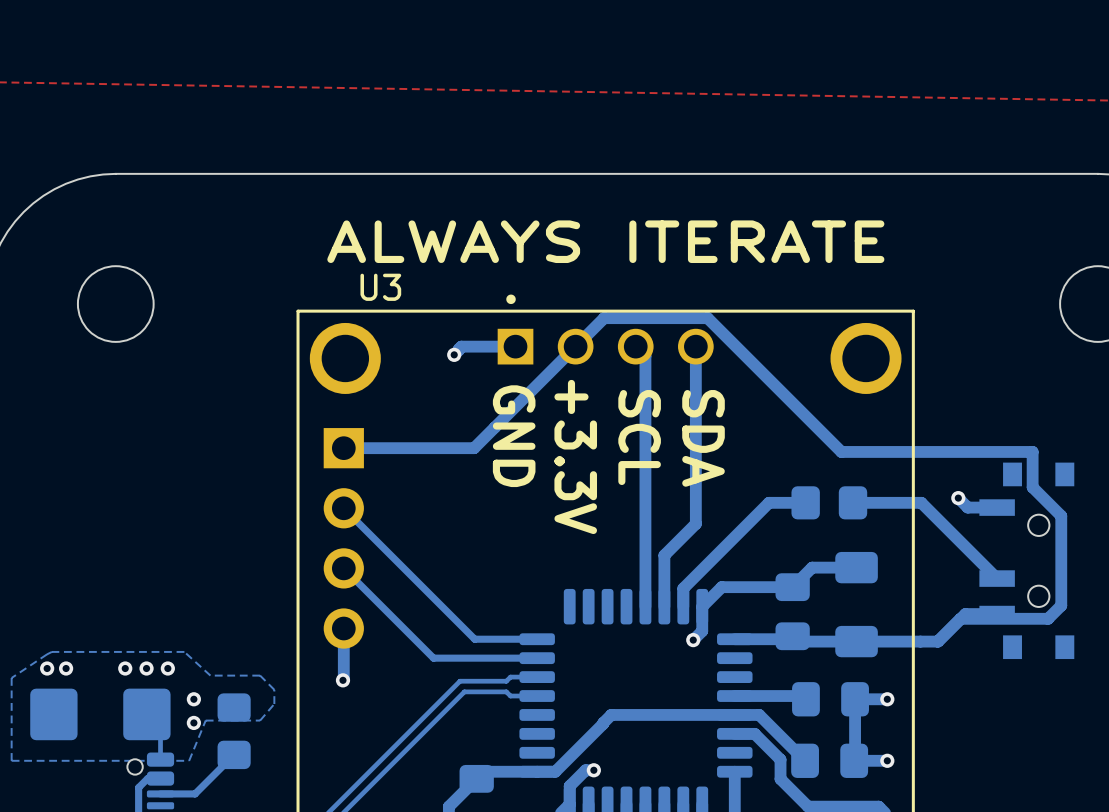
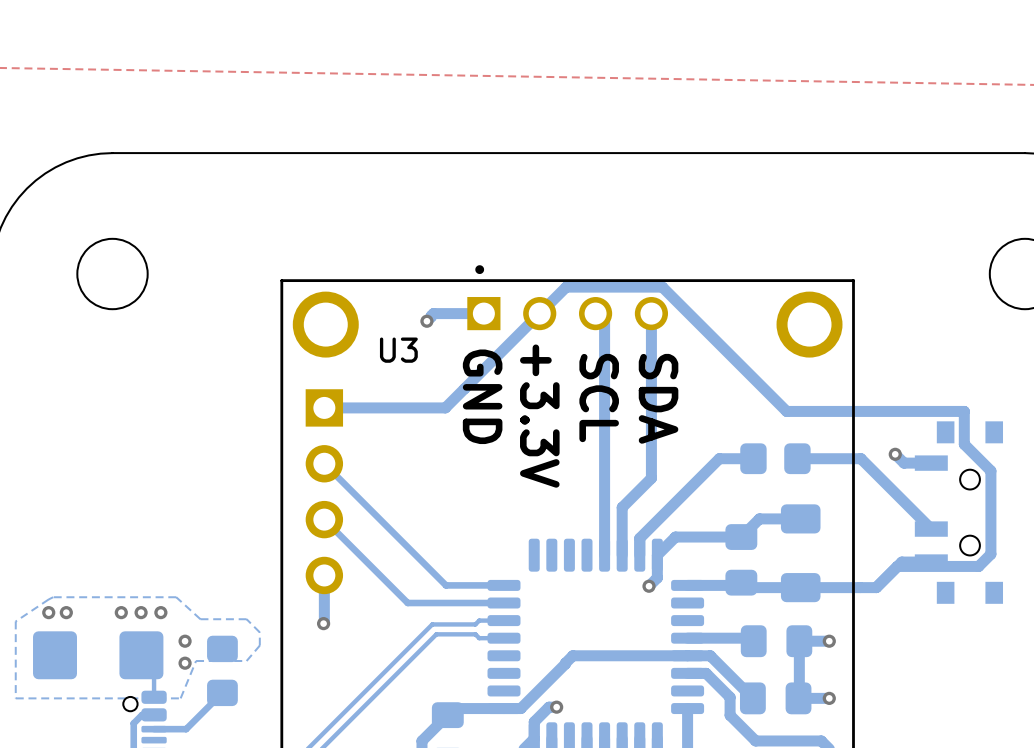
text: ALWAYS ITERATE (605, 241) -> none
U3 name position: U3 (380, 287) -> U3 (398, 350)

